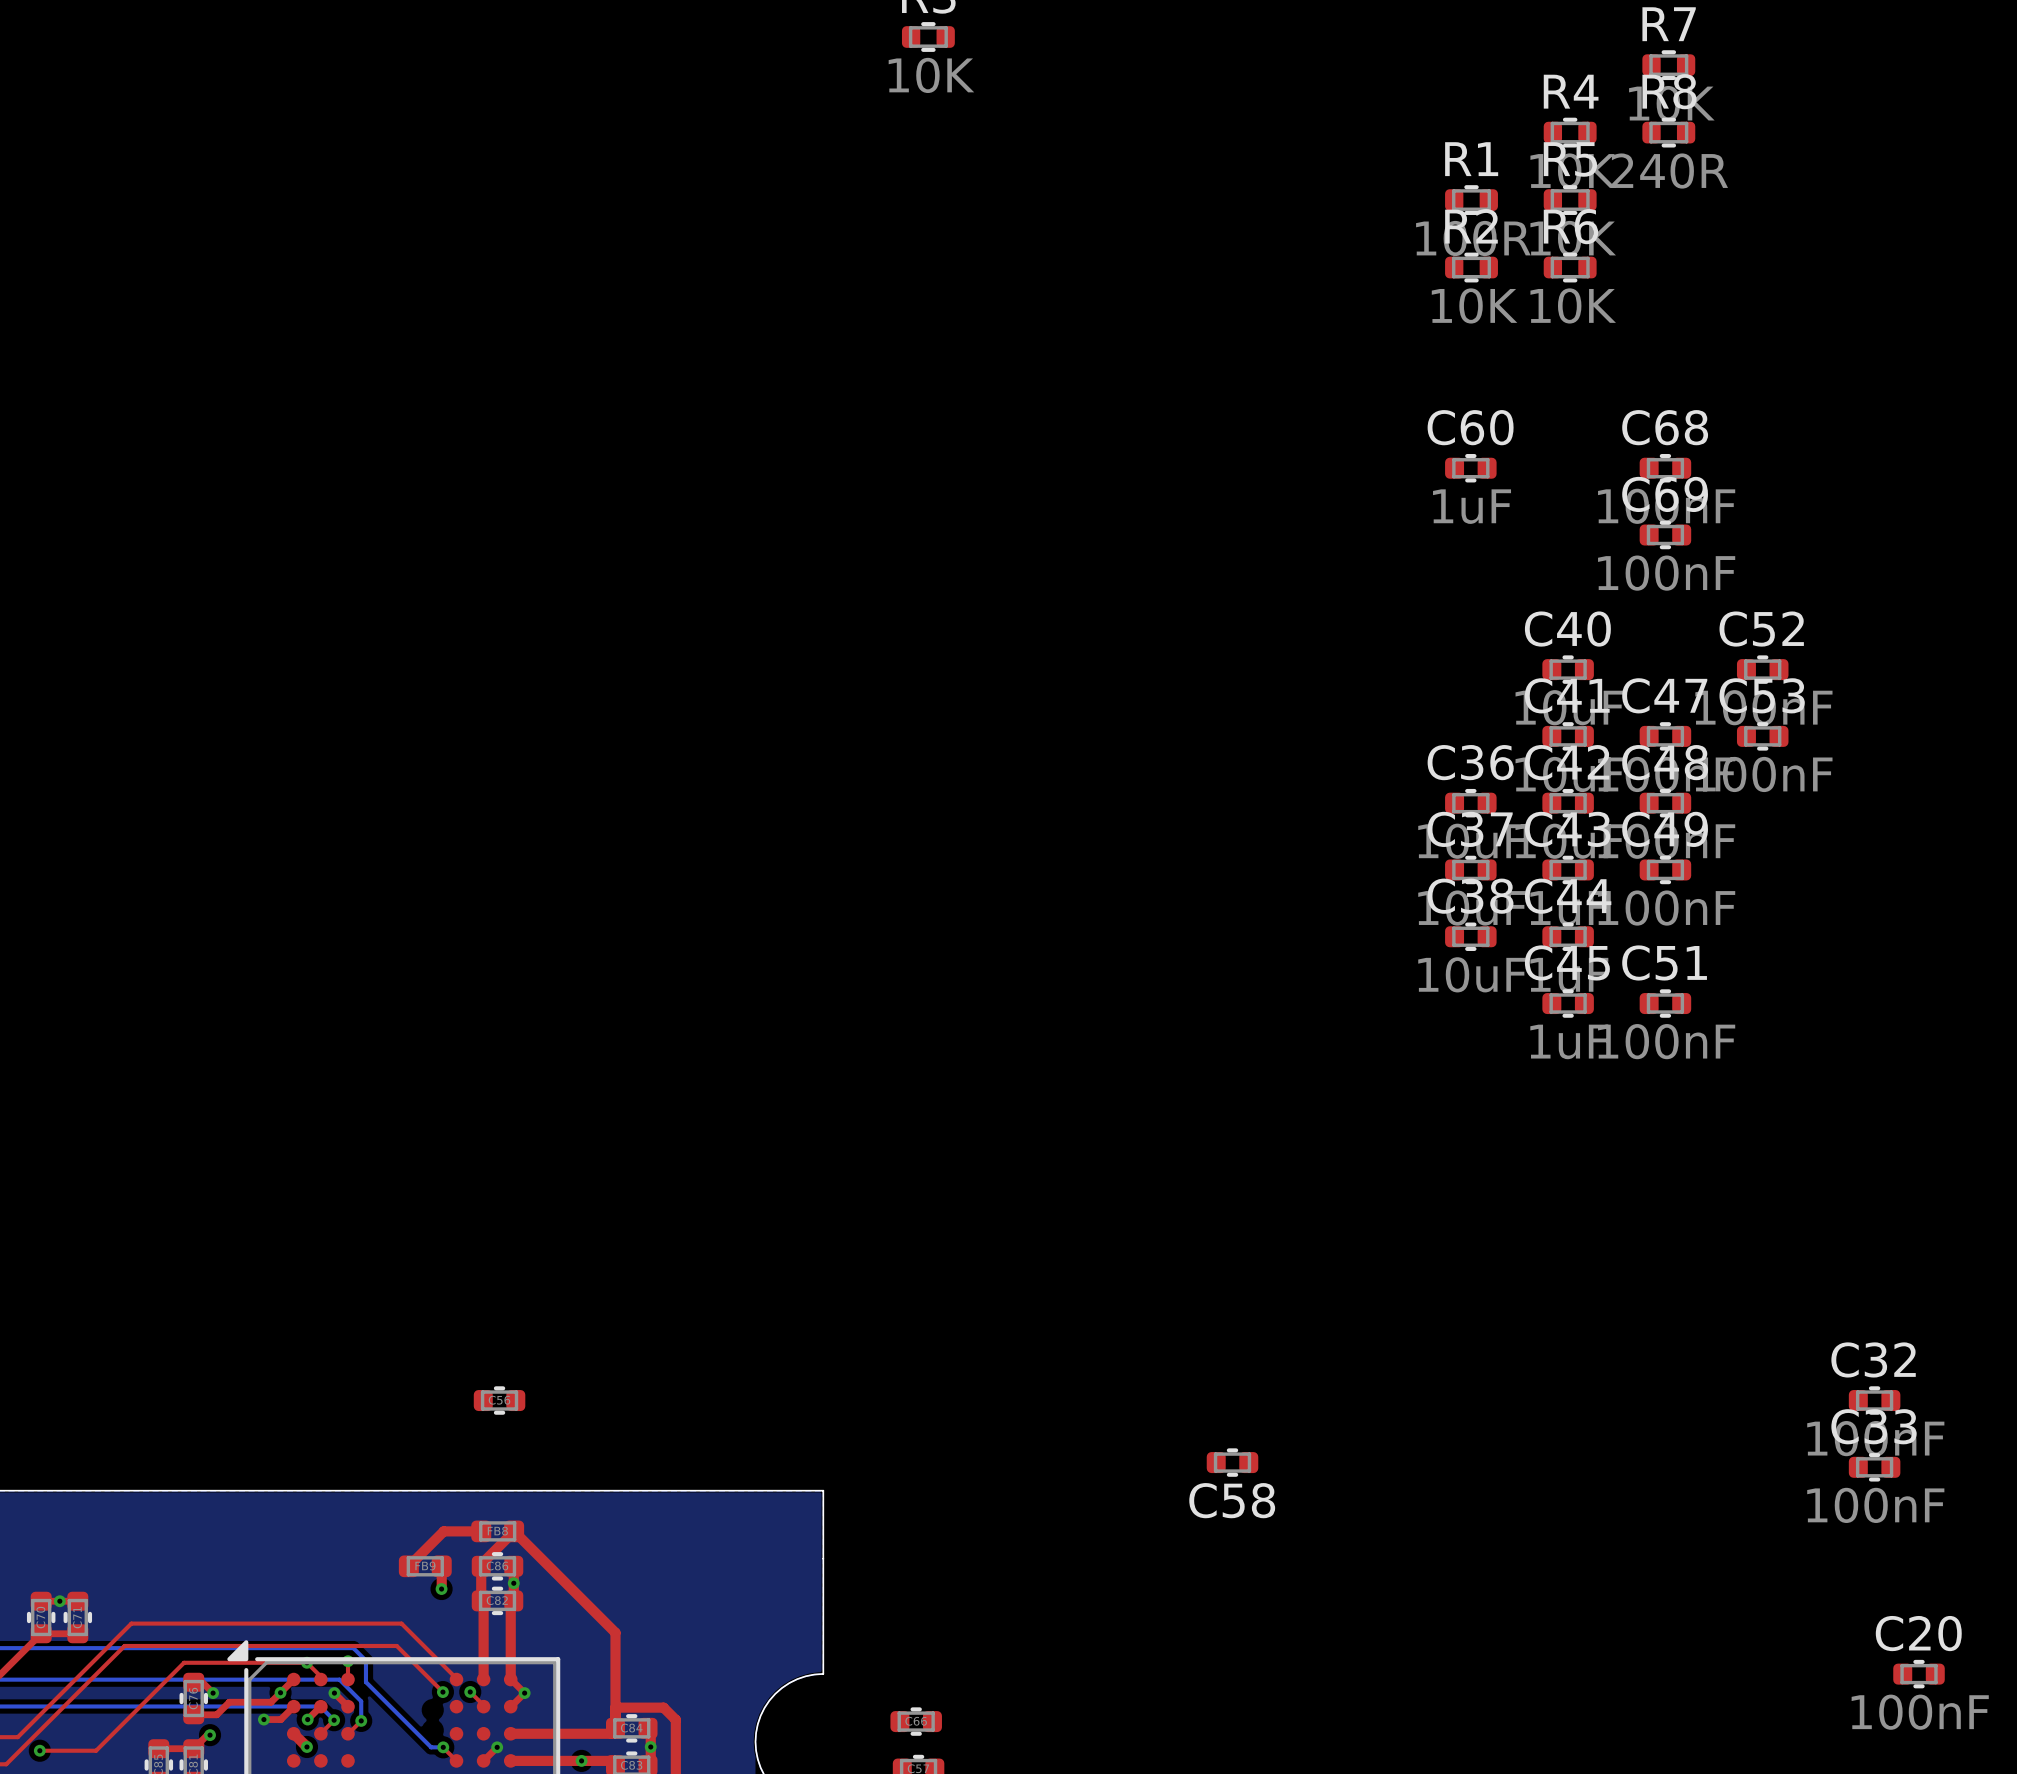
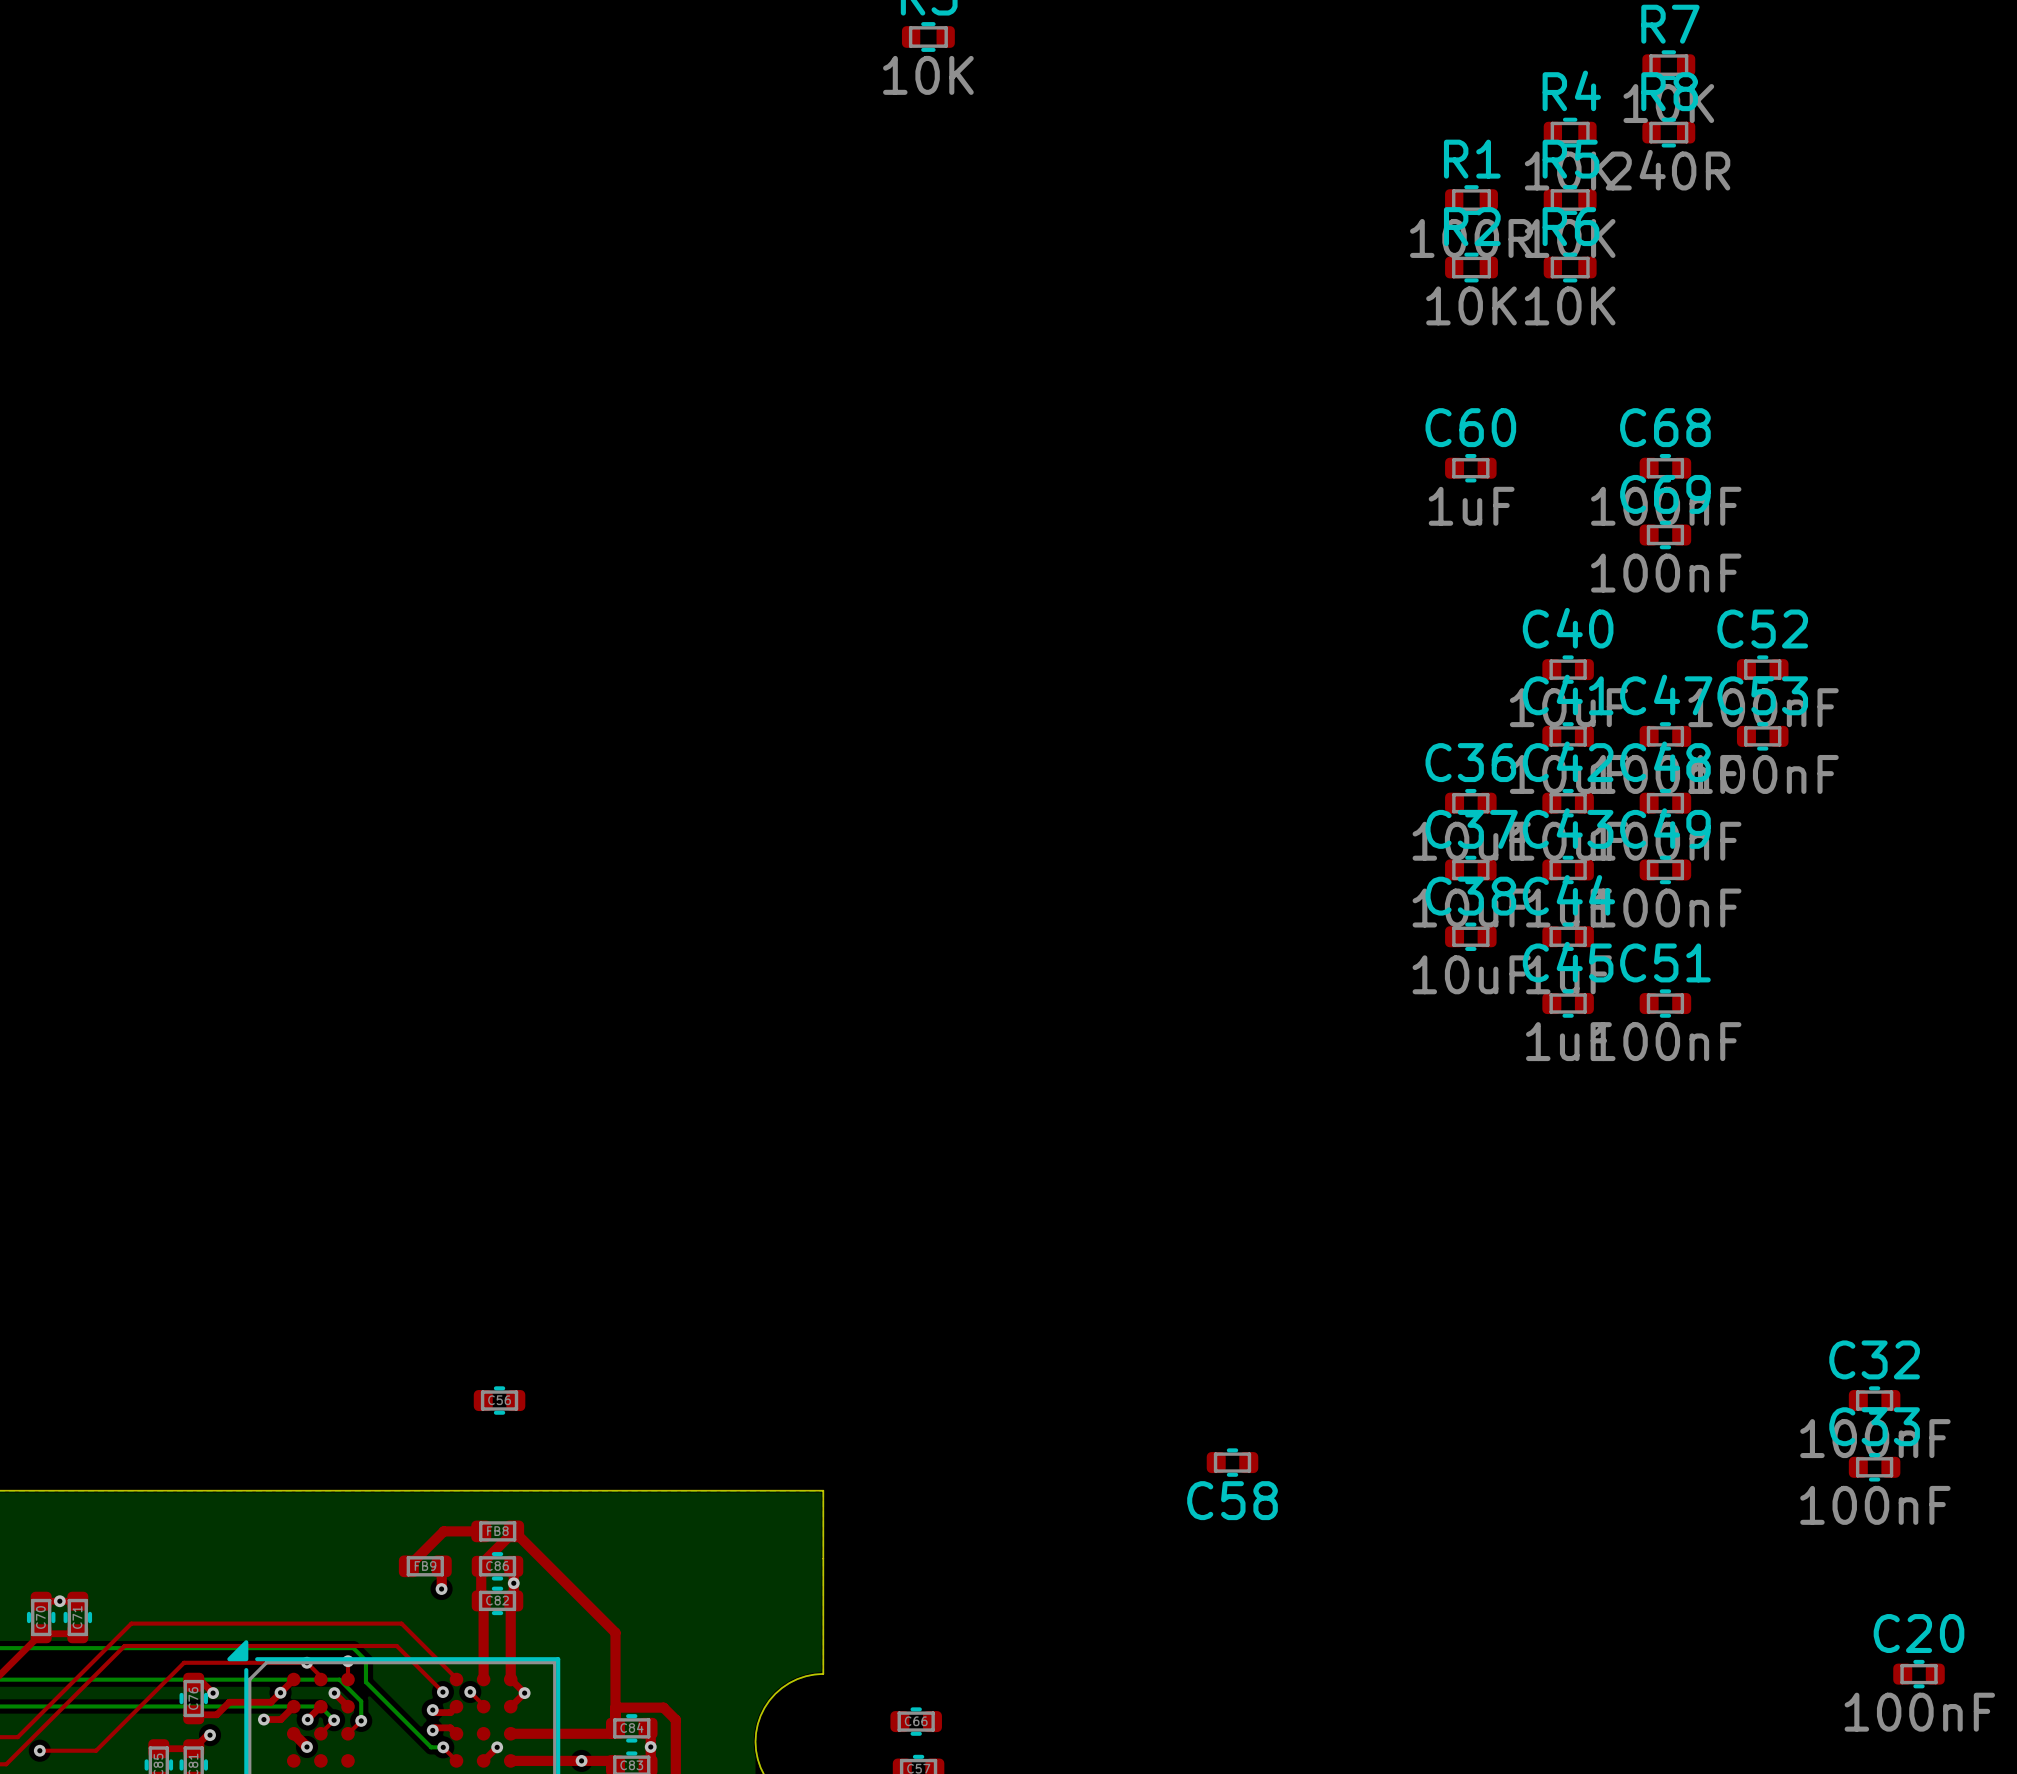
top track: none -> (456, 1706) (450, 1712) (435, 1712) (432, 1710)
via: none -> (432, 1710)
top track: none -> (432, 1730) (435, 1727) (450, 1727) (456, 1733)
via: none -> (432, 1730)

